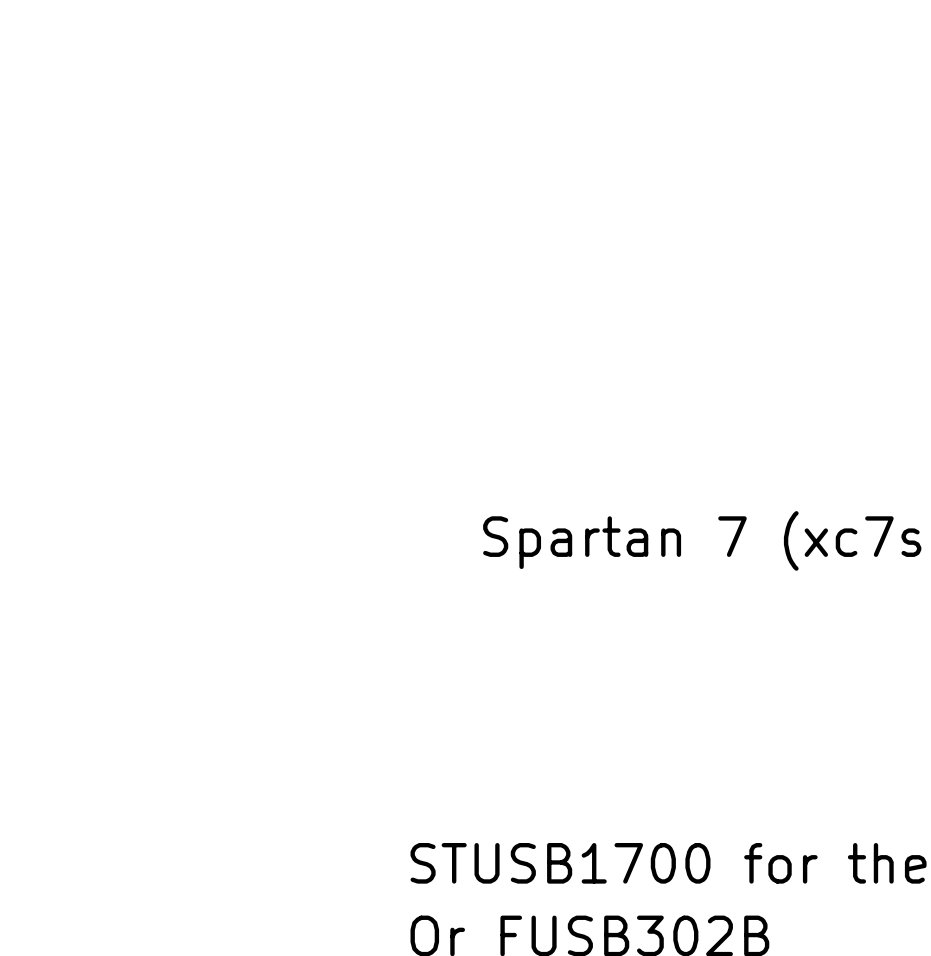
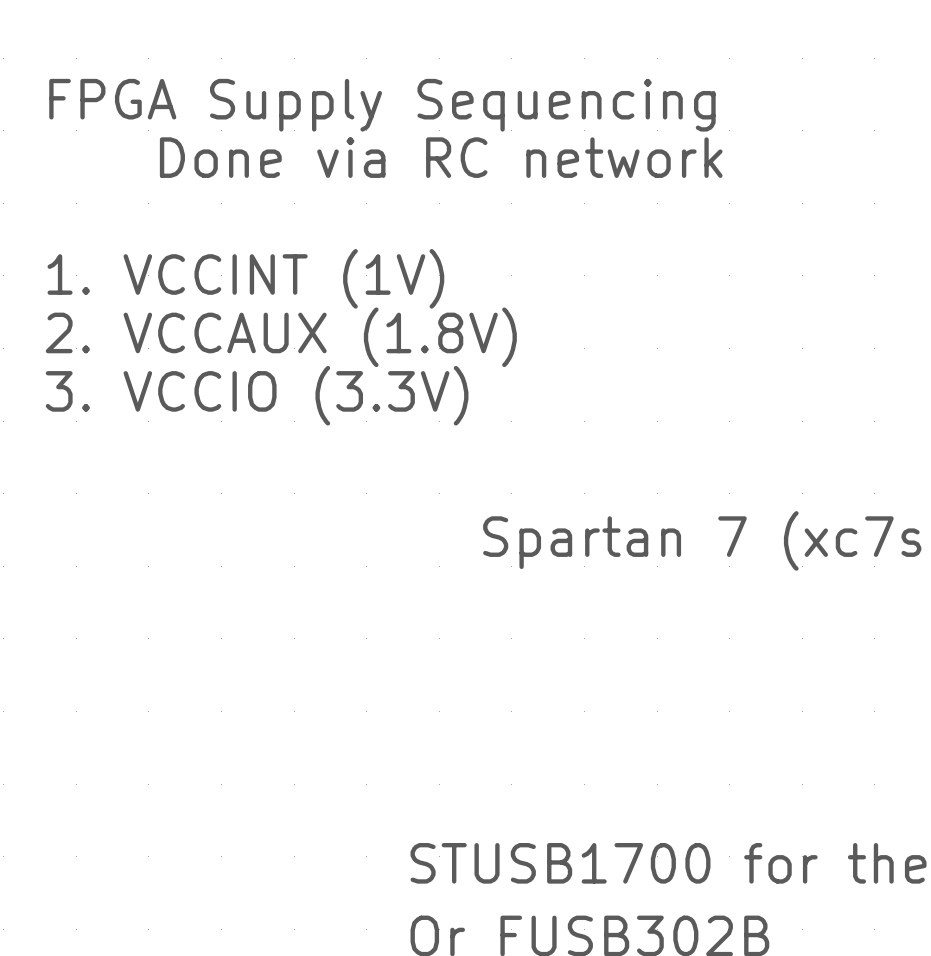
text: none -> FPGA Supply Sequencing (382, 105)
text: none -> Done via RC network (441, 157)
text: none -> 1. VCCINT (1V) (245, 278)
text: none -> 2. VCCAUX (1.8V) (281, 337)
text: none -> 3. VCCIO (3.3V) (257, 395)

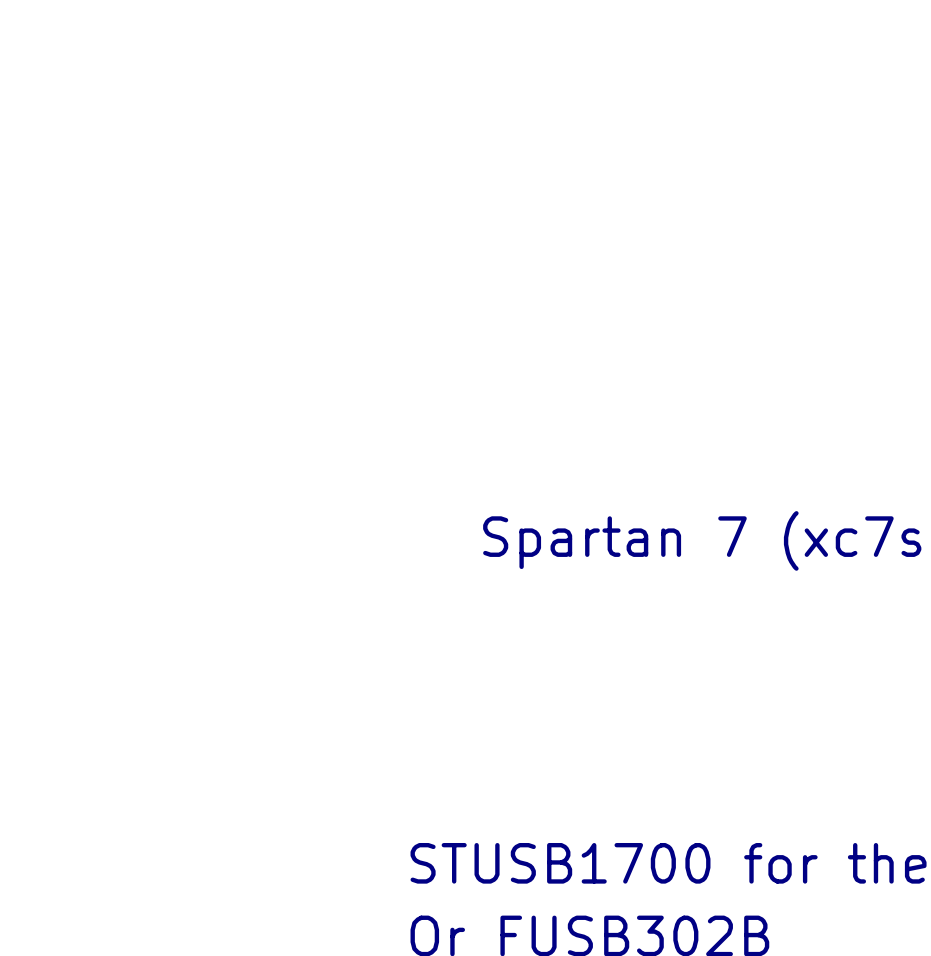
text: FPGA Supply Sequencing (382, 105) -> none
text: Done via RC network (441, 157) -> none
text: 1. VCCINT (1V) (245, 278) -> none
text: 2. VCCAUX (1.8V) (281, 337) -> none
text: 3. VCCIO (3.3V) (257, 395) -> none

